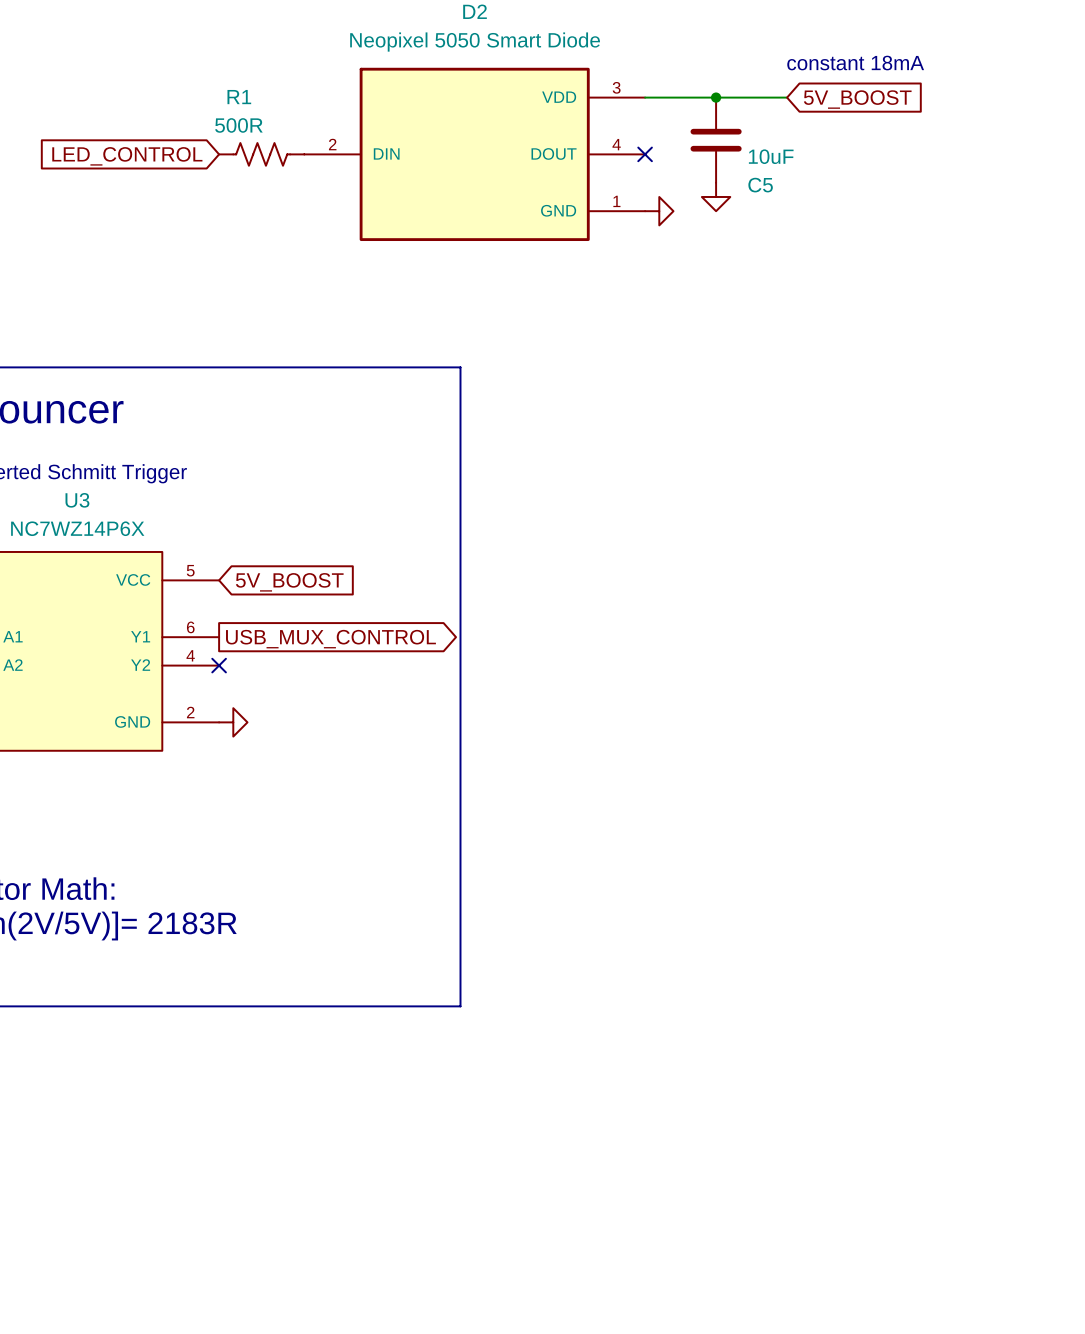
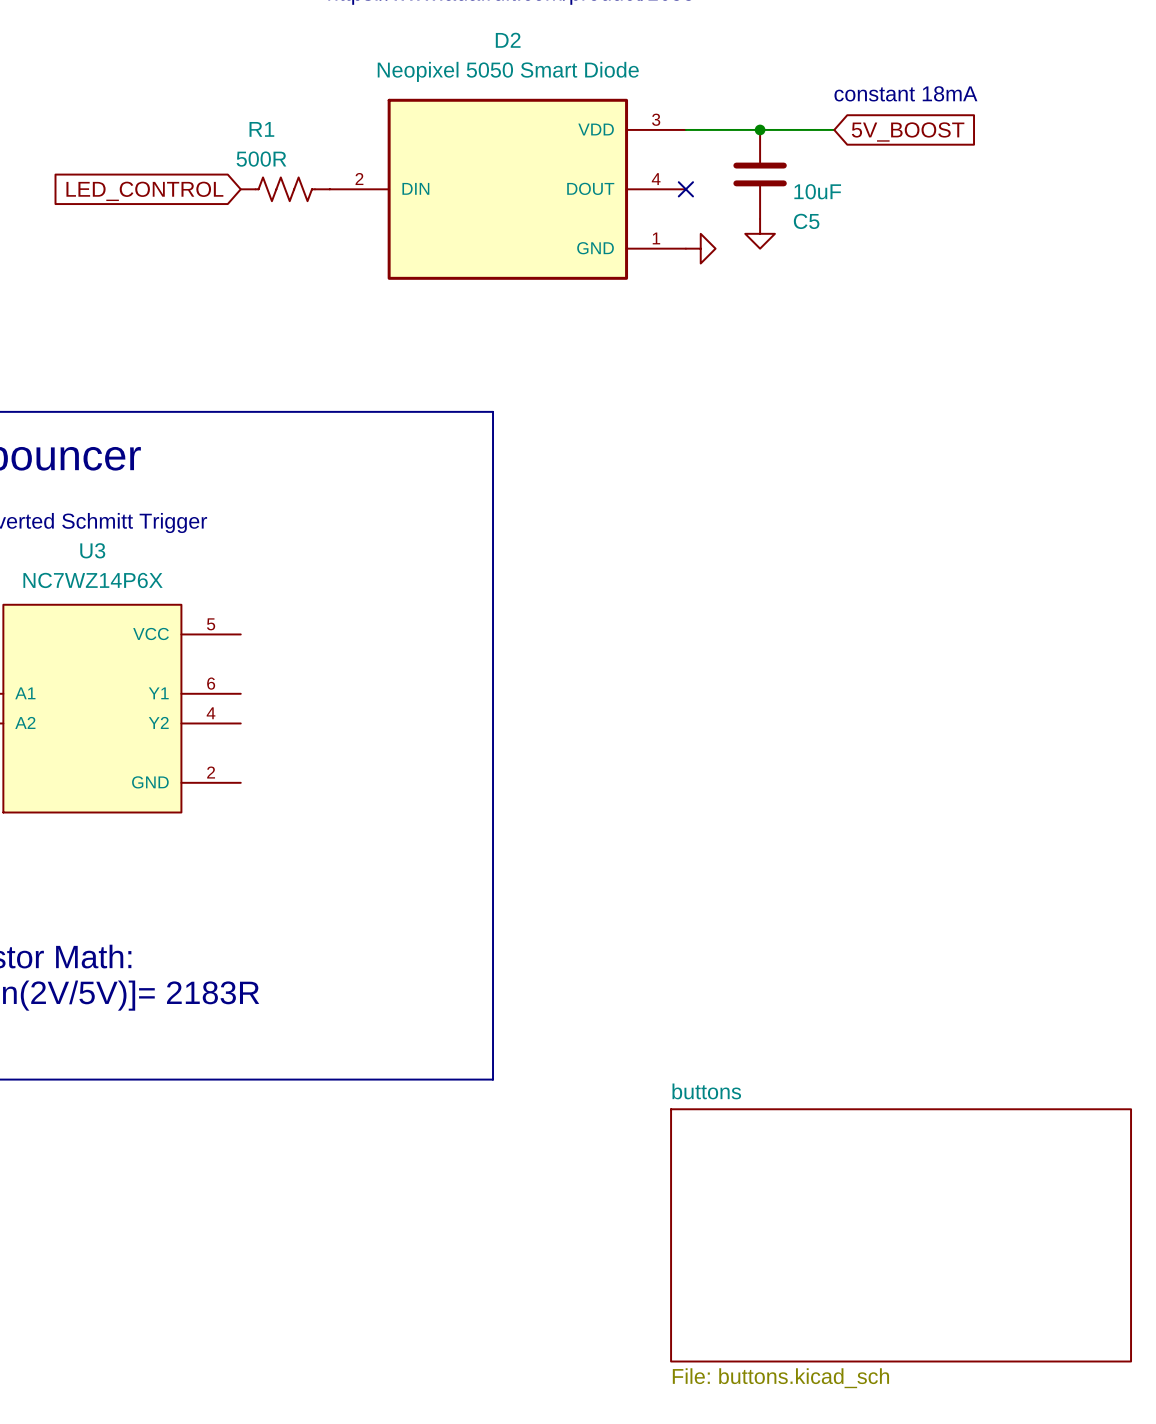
global label: 5V_BOOST (289, 582) -> none
global label: USB_MUX_CONTROL (330, 639) -> none
no-connect mark: (219, 665) -> none
power symbol: (233, 722) -> none
sheet buttons: none -> File: buttons.kicad_sch (901, 1235)

